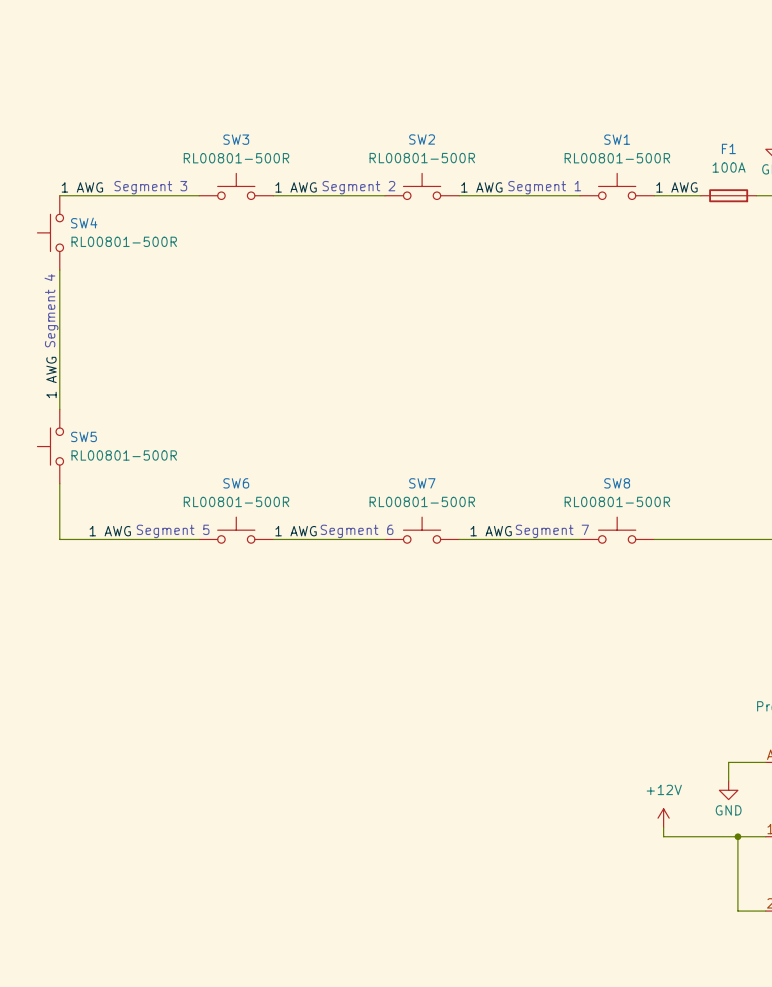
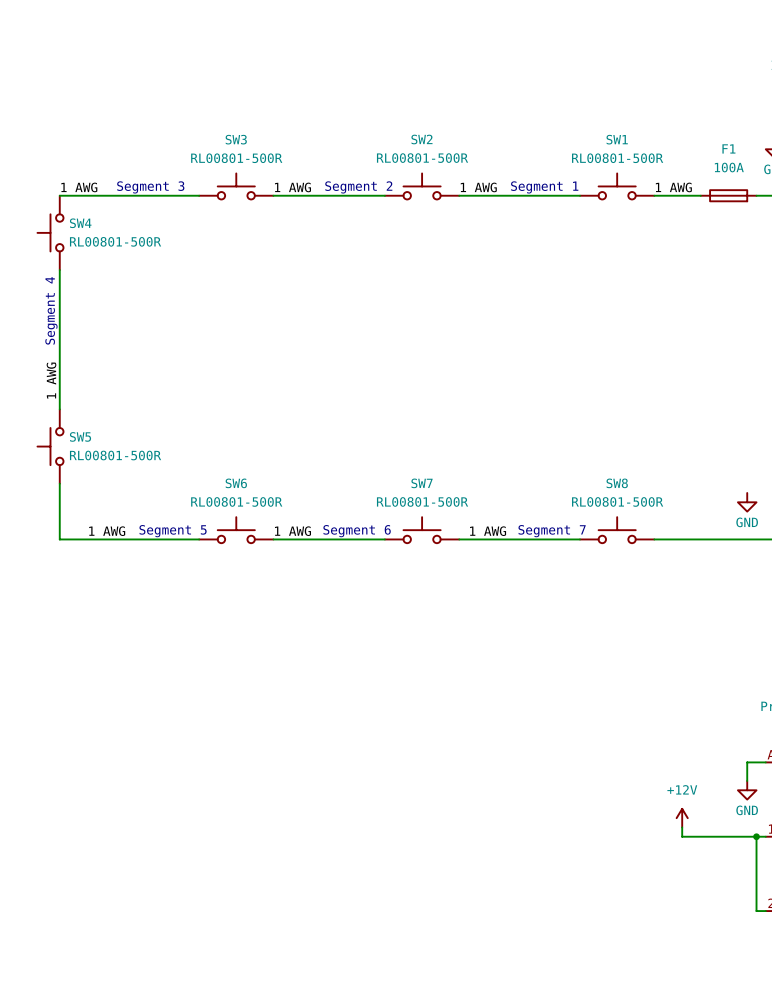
power symbol: none -> GND (747, 502)
wire: (747, 762) (728, 762) (728, 780) -> (747, 762) (747, 780)
power symbol position: GND (728, 790) -> GND (747, 790)
power symbol position: +12V (663, 818) -> +12V (682, 818)
wire: (663, 827) (663, 836) (682, 836) -> (682, 827) (682, 836)
wire: (737, 836) (737, 911) (756, 911) -> (756, 836) (756, 911)
junction position: (737, 836) -> (756, 836)

